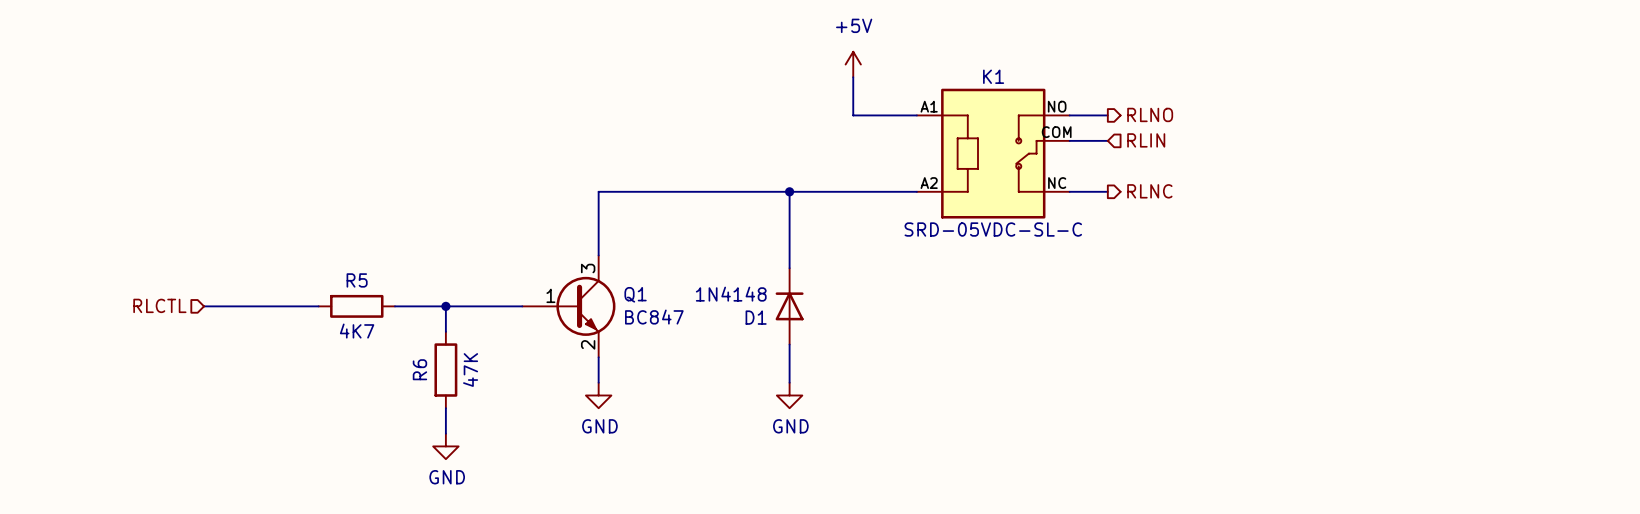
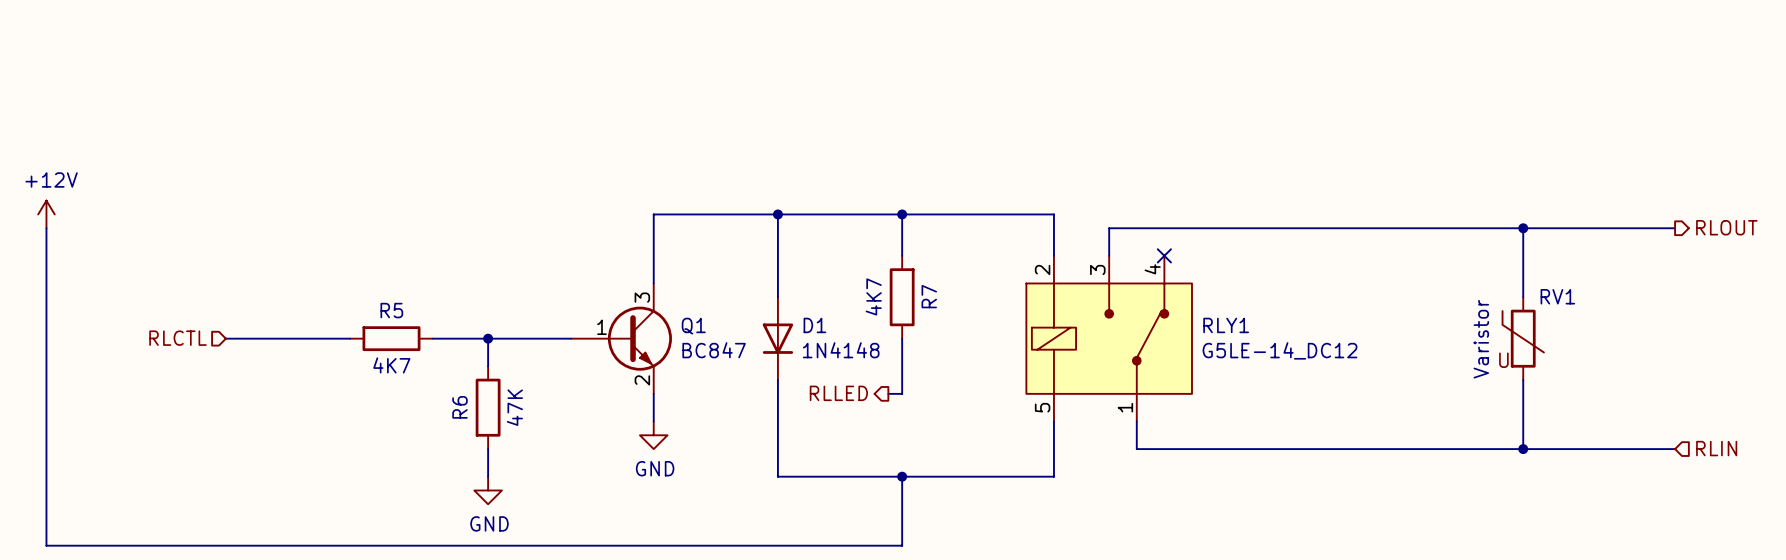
power symbol: +5V (853, 64) -> none
wire: (853, 77) (853, 115) (916, 115) -> none
hierarchical label: RLNO (1150, 114) -> none
wire: (1069, 115) (1107, 115) -> none
wire: (1069, 140) (1107, 140) -> none
hierarchical label: RLIN (1146, 140) -> none
K1: SRD-05VDC-SL-C (993, 153) -> none
power symbol: none -> +12V (46, 214)
junction: none -> (777, 214)
wire: (789, 191) (789, 268) -> (777, 214) (777, 297)
junction: (789, 191) -> none
junction: none -> (902, 214)
wire: (1069, 191) (1107, 191) -> none
hierarchical label: RLNC (1149, 191) -> none
wire: none -> (46, 228) (46, 545) (902, 545) (902, 476)
wire: none -> (1523, 228) (1523, 297)
junction: none -> (1523, 228)
wire: none -> (1675, 228) (1109, 228) (1109, 255)
hierarchical label: none -> RLOUT (1726, 227)
no-connect mark: none -> (1164, 255)
R7: none -> 4K7 (902, 297)
D1 rotation: 0° (789, 306) -> 180° (777, 338)
D1 position: (789, 306) -> (777, 338)
wire: none -> (902, 338) (902, 393) (888, 393)
RLY1: none -> G5LE-14_DC12 (1109, 338)
RV1: none -> Varistor (1523, 338)
wire: none -> (777, 380) (777, 476) (1053, 476) (1053, 421)
wire: (789, 344) (789, 382) -> (902, 214) (902, 255)
wire: none -> (1523, 380) (1523, 449)
hierarchical label: none -> RLLED (838, 393)
wire: none -> (1136, 421) (1136, 449) (1675, 449)
power symbol: GND (789, 395) -> none
hierarchical label: none -> RLIN (1716, 448)
junction: none -> (1523, 449)
junction: none -> (902, 476)

